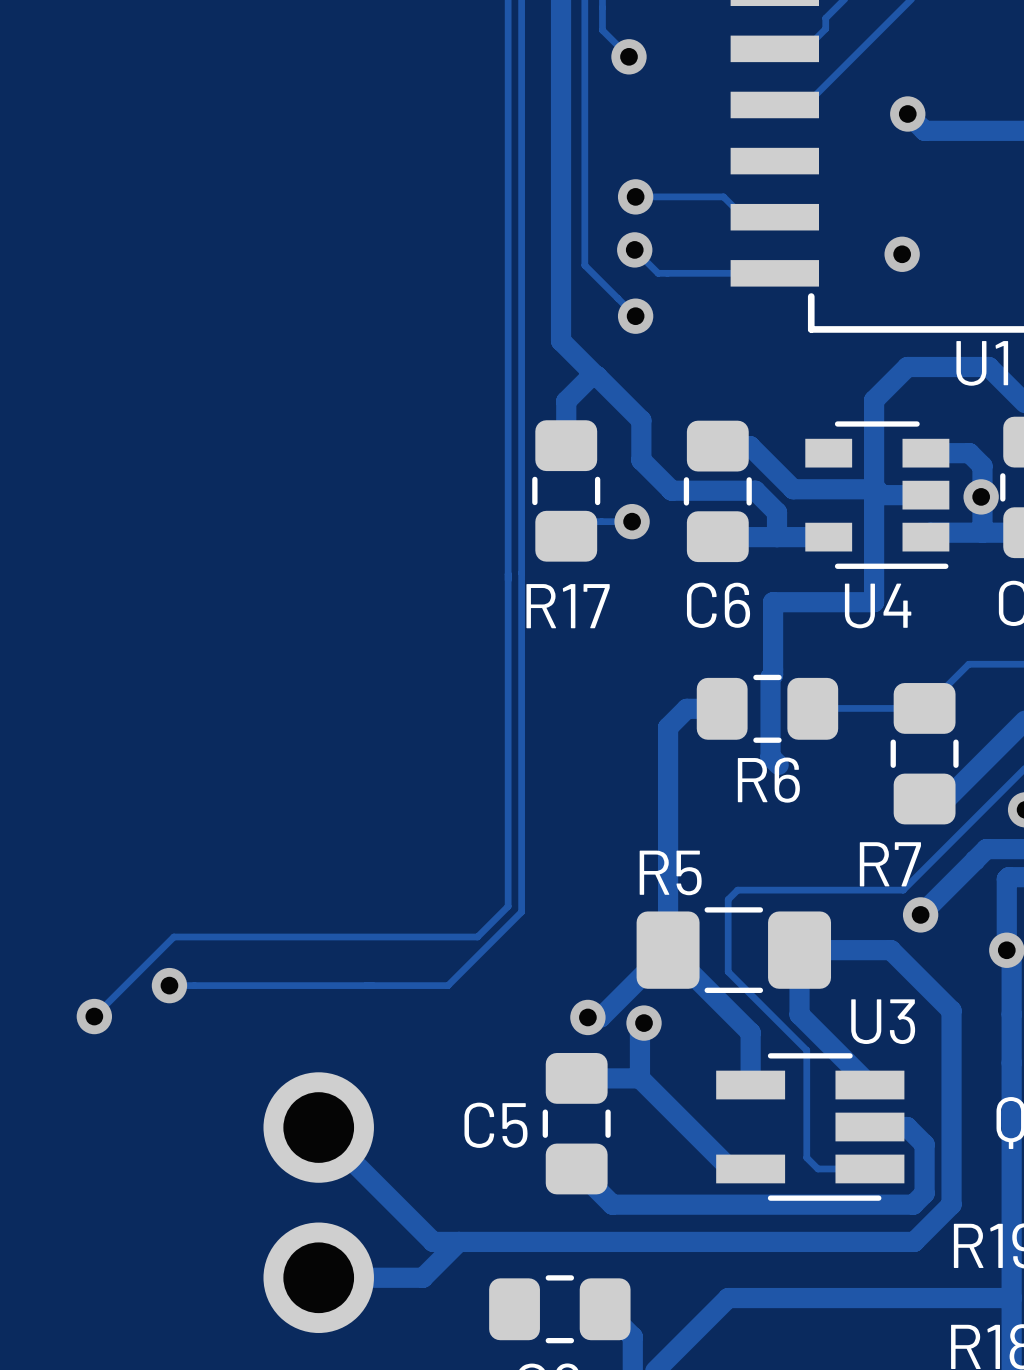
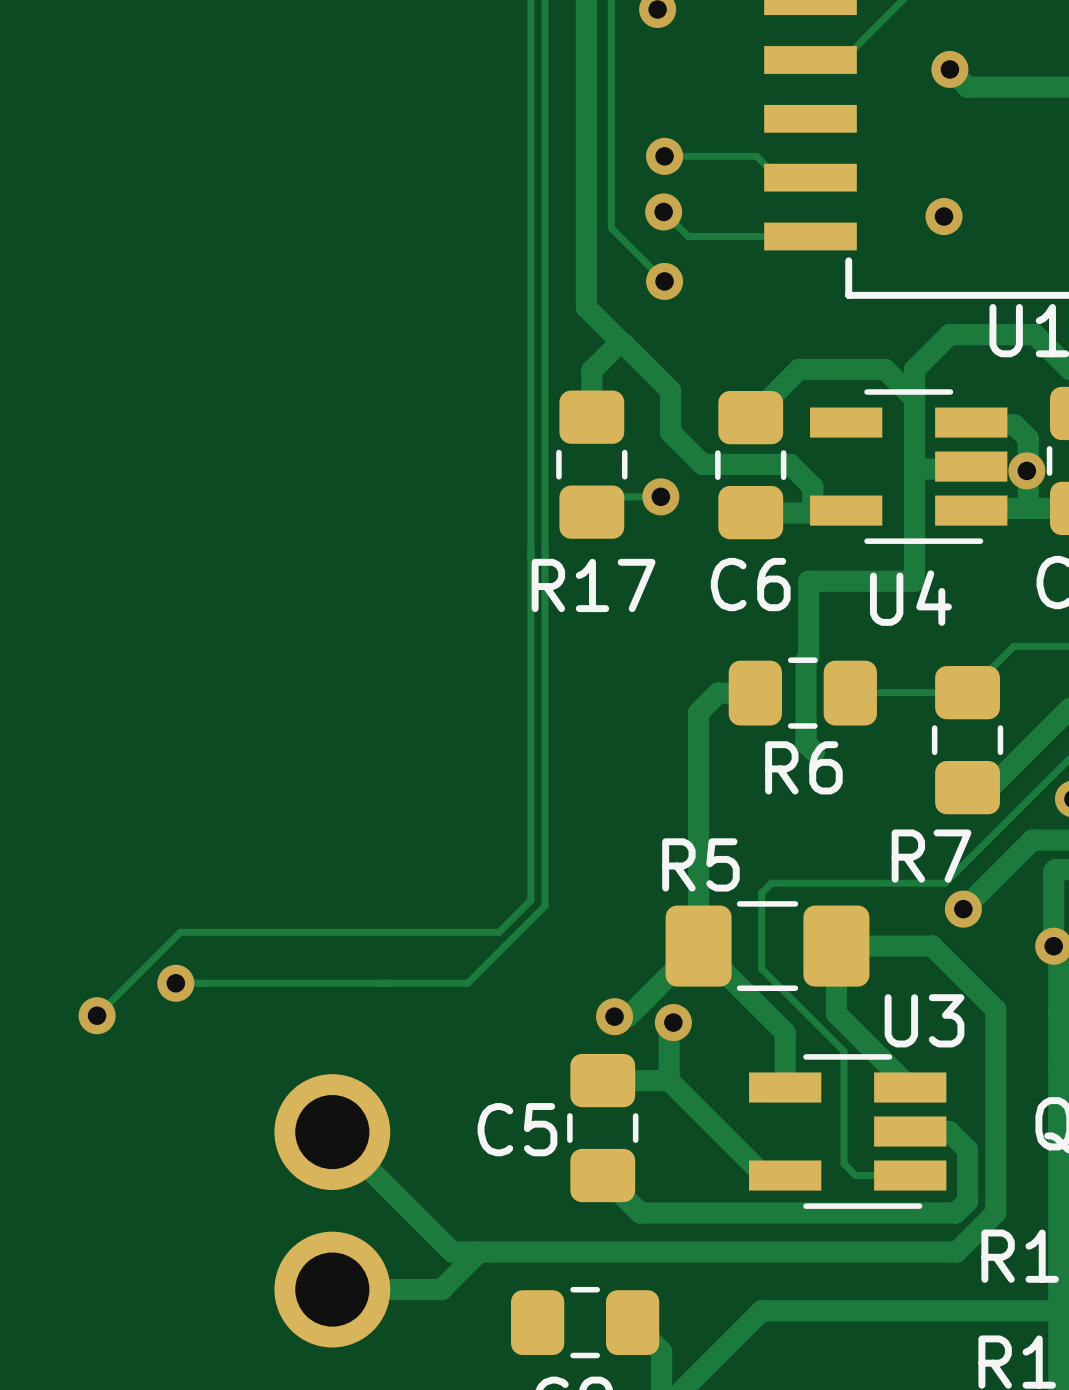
U4 footprint: [805, 421, 950, 569] -> [810, 389, 1008, 544]
track: (717, 446) (750, 446) (793, 489) (876, 489) (882, 495) -> (750, 417) (798, 369) (885, 369) (914, 398)
U4 name position: U4 (878, 605) -> U4 (910, 598)

